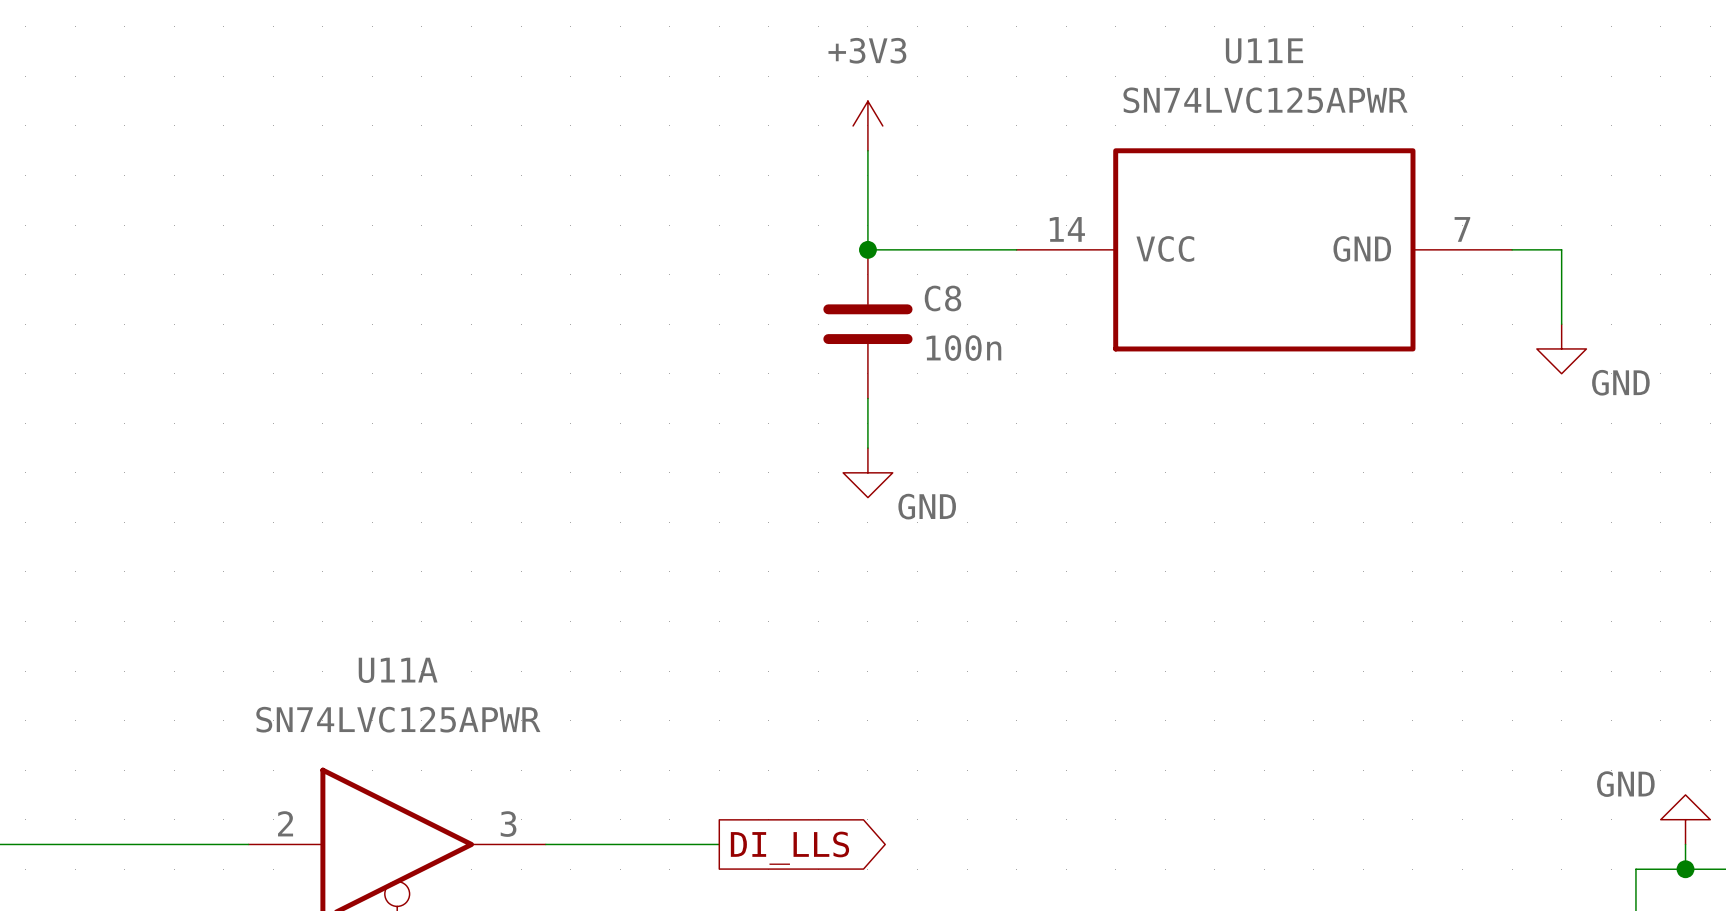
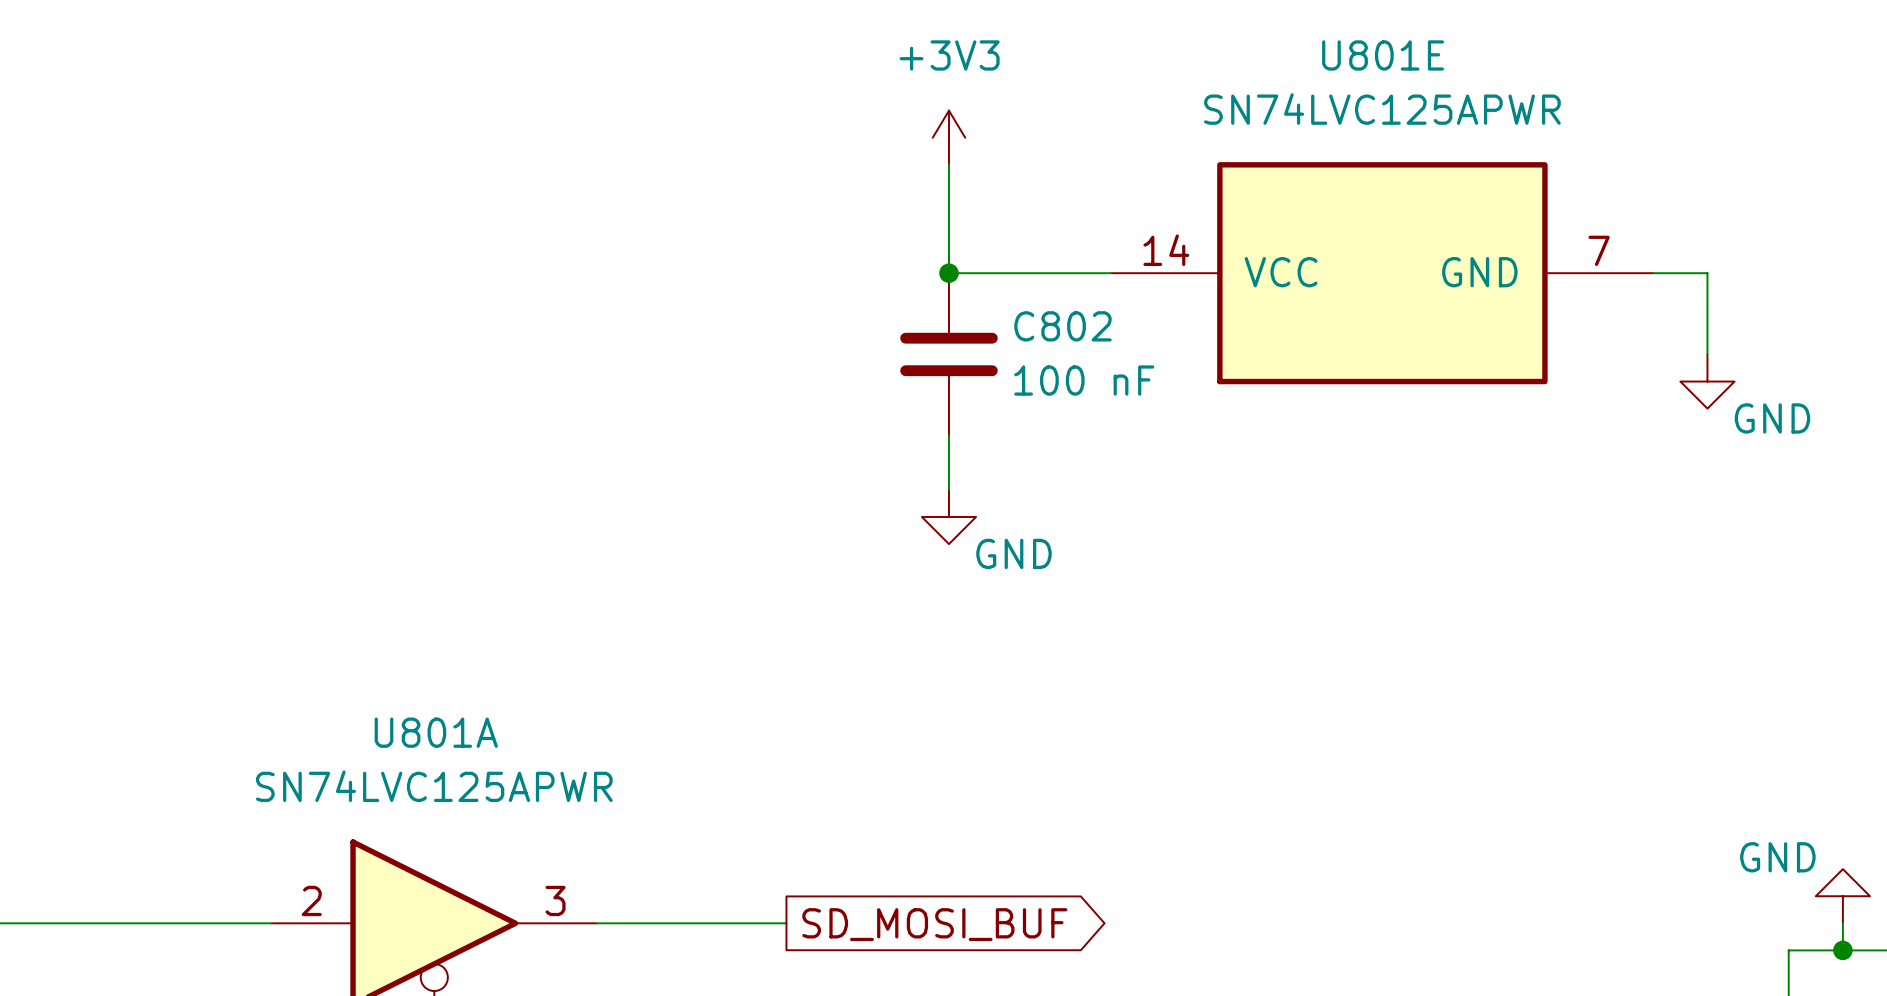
U11E name: U11E (1264, 50) -> U801E (1383, 55)
C8 name: C8 (942, 298) -> C802 (1062, 326)
C8 value: 100n (963, 348) -> 100 nF (1084, 380)
U11A name: U11A (398, 670) -> U801A (436, 732)
global label: DI_LLS (789, 848) -> SD_MOSI_BUF (934, 924)

